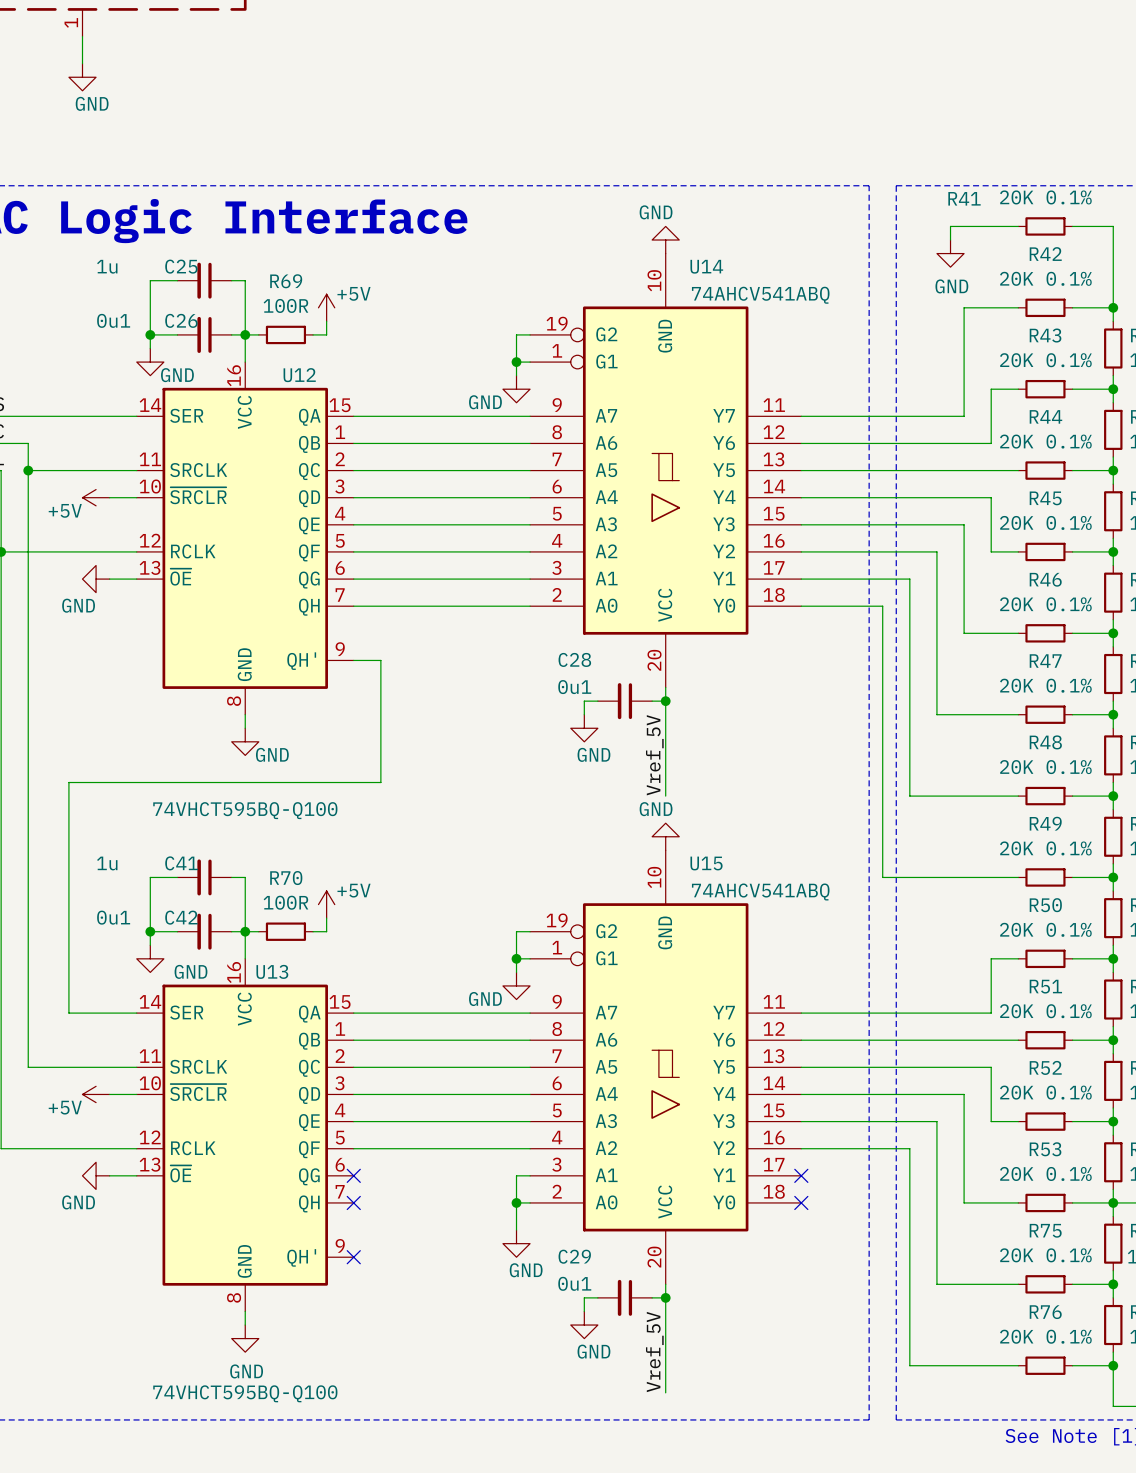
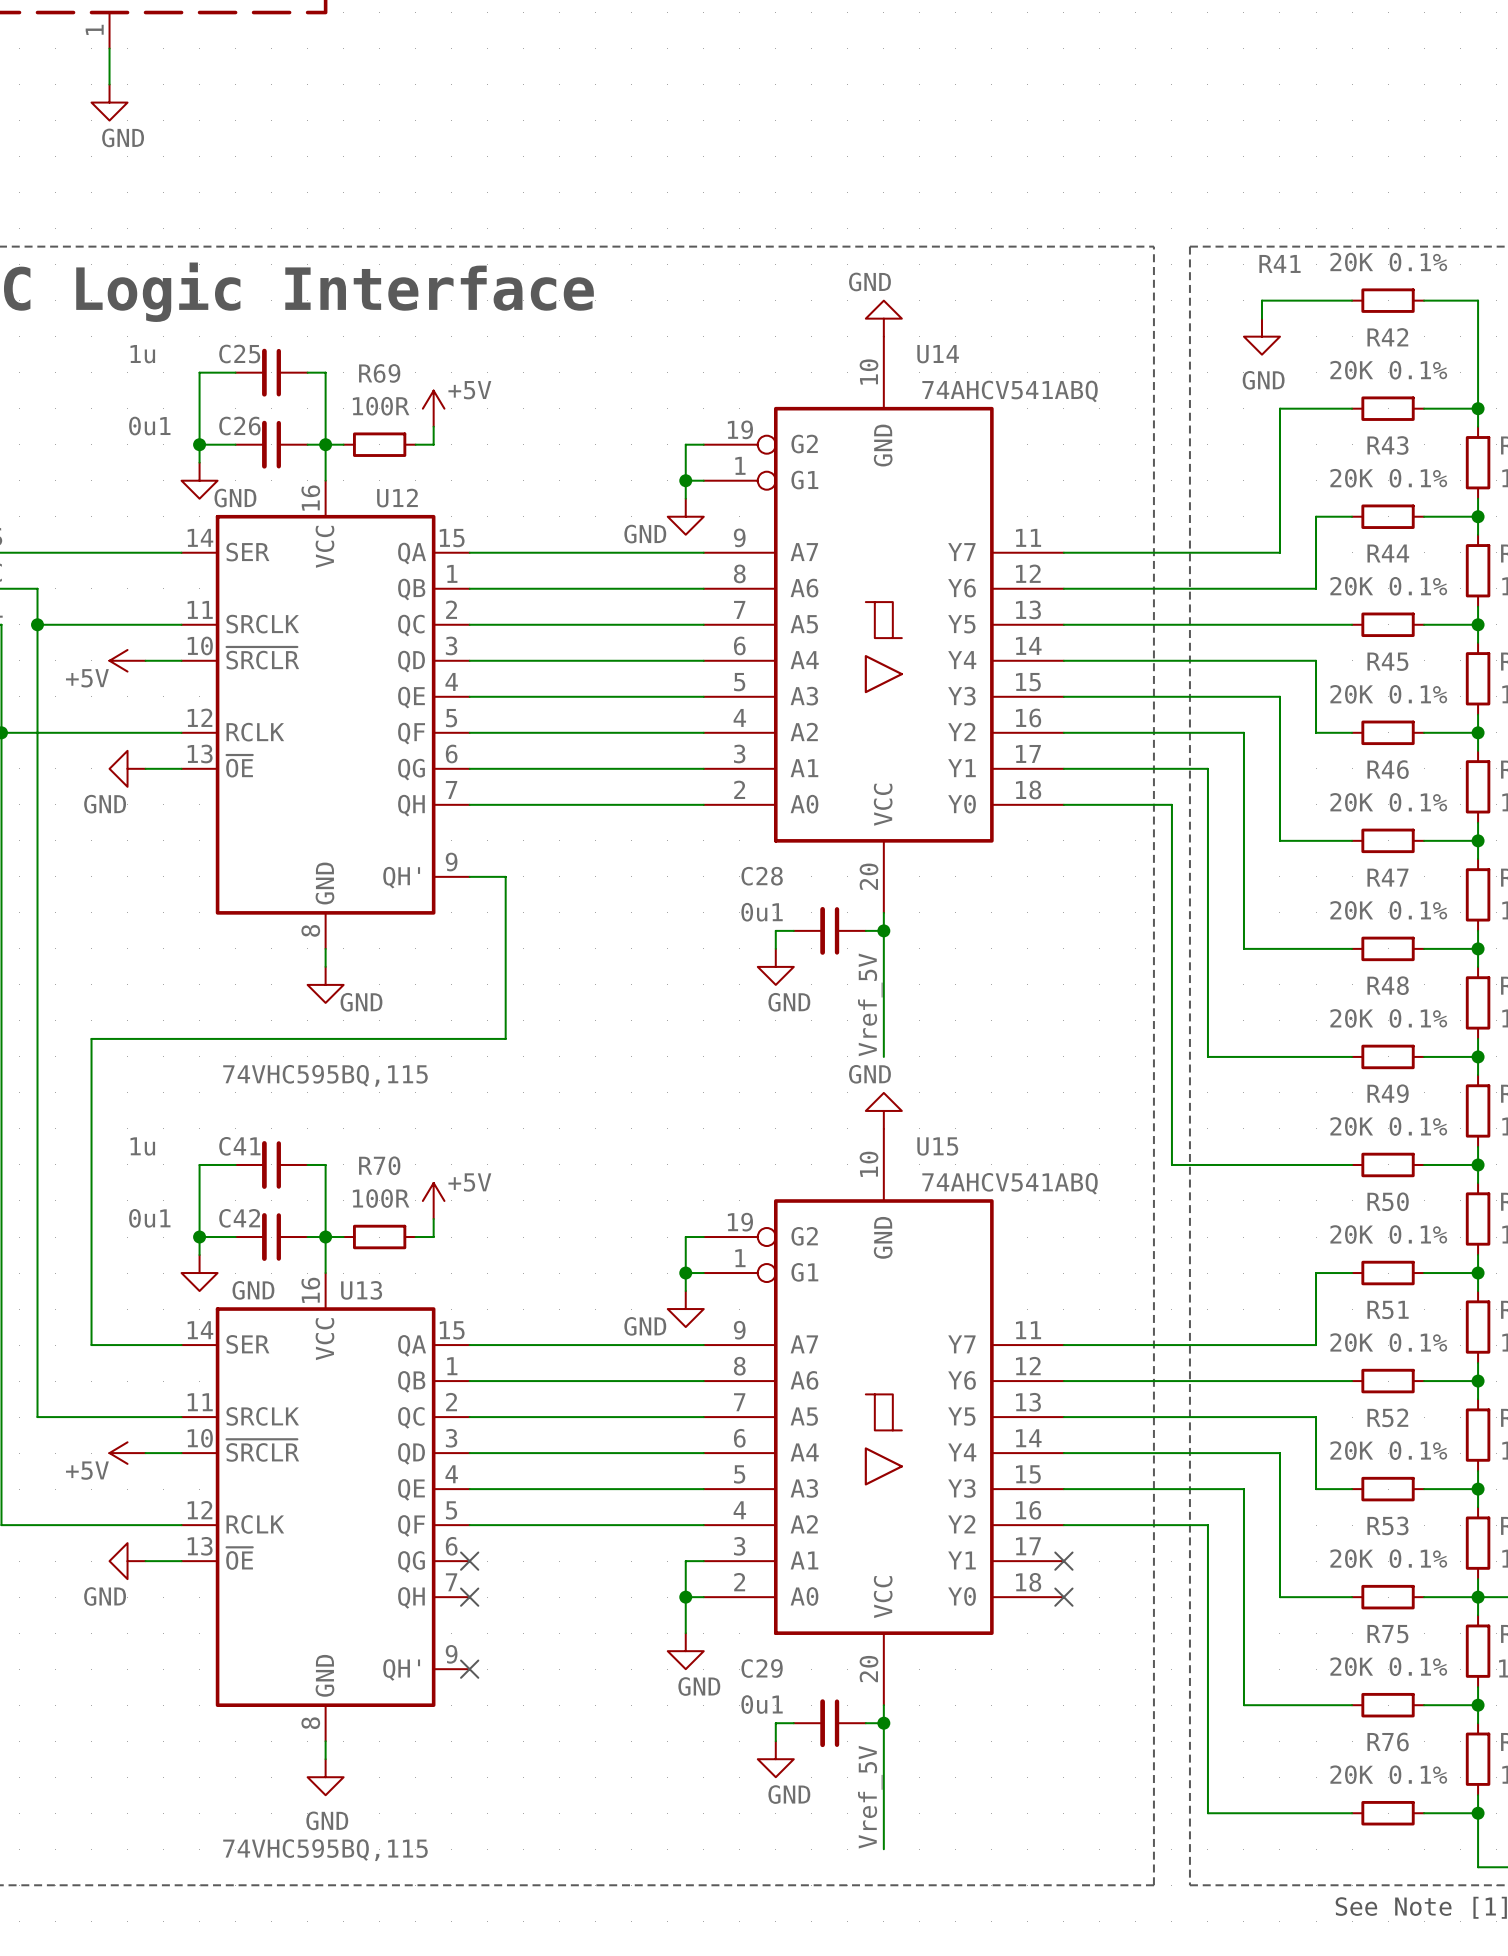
U12 value: 74VHCT595BQ-Q100 (245, 810) -> 74VHC595BQ,115 (325, 1075)
U13 value: 74VHCT595BQ-Q100 (245, 1393) -> 74VHC595BQ,115 (325, 1850)

